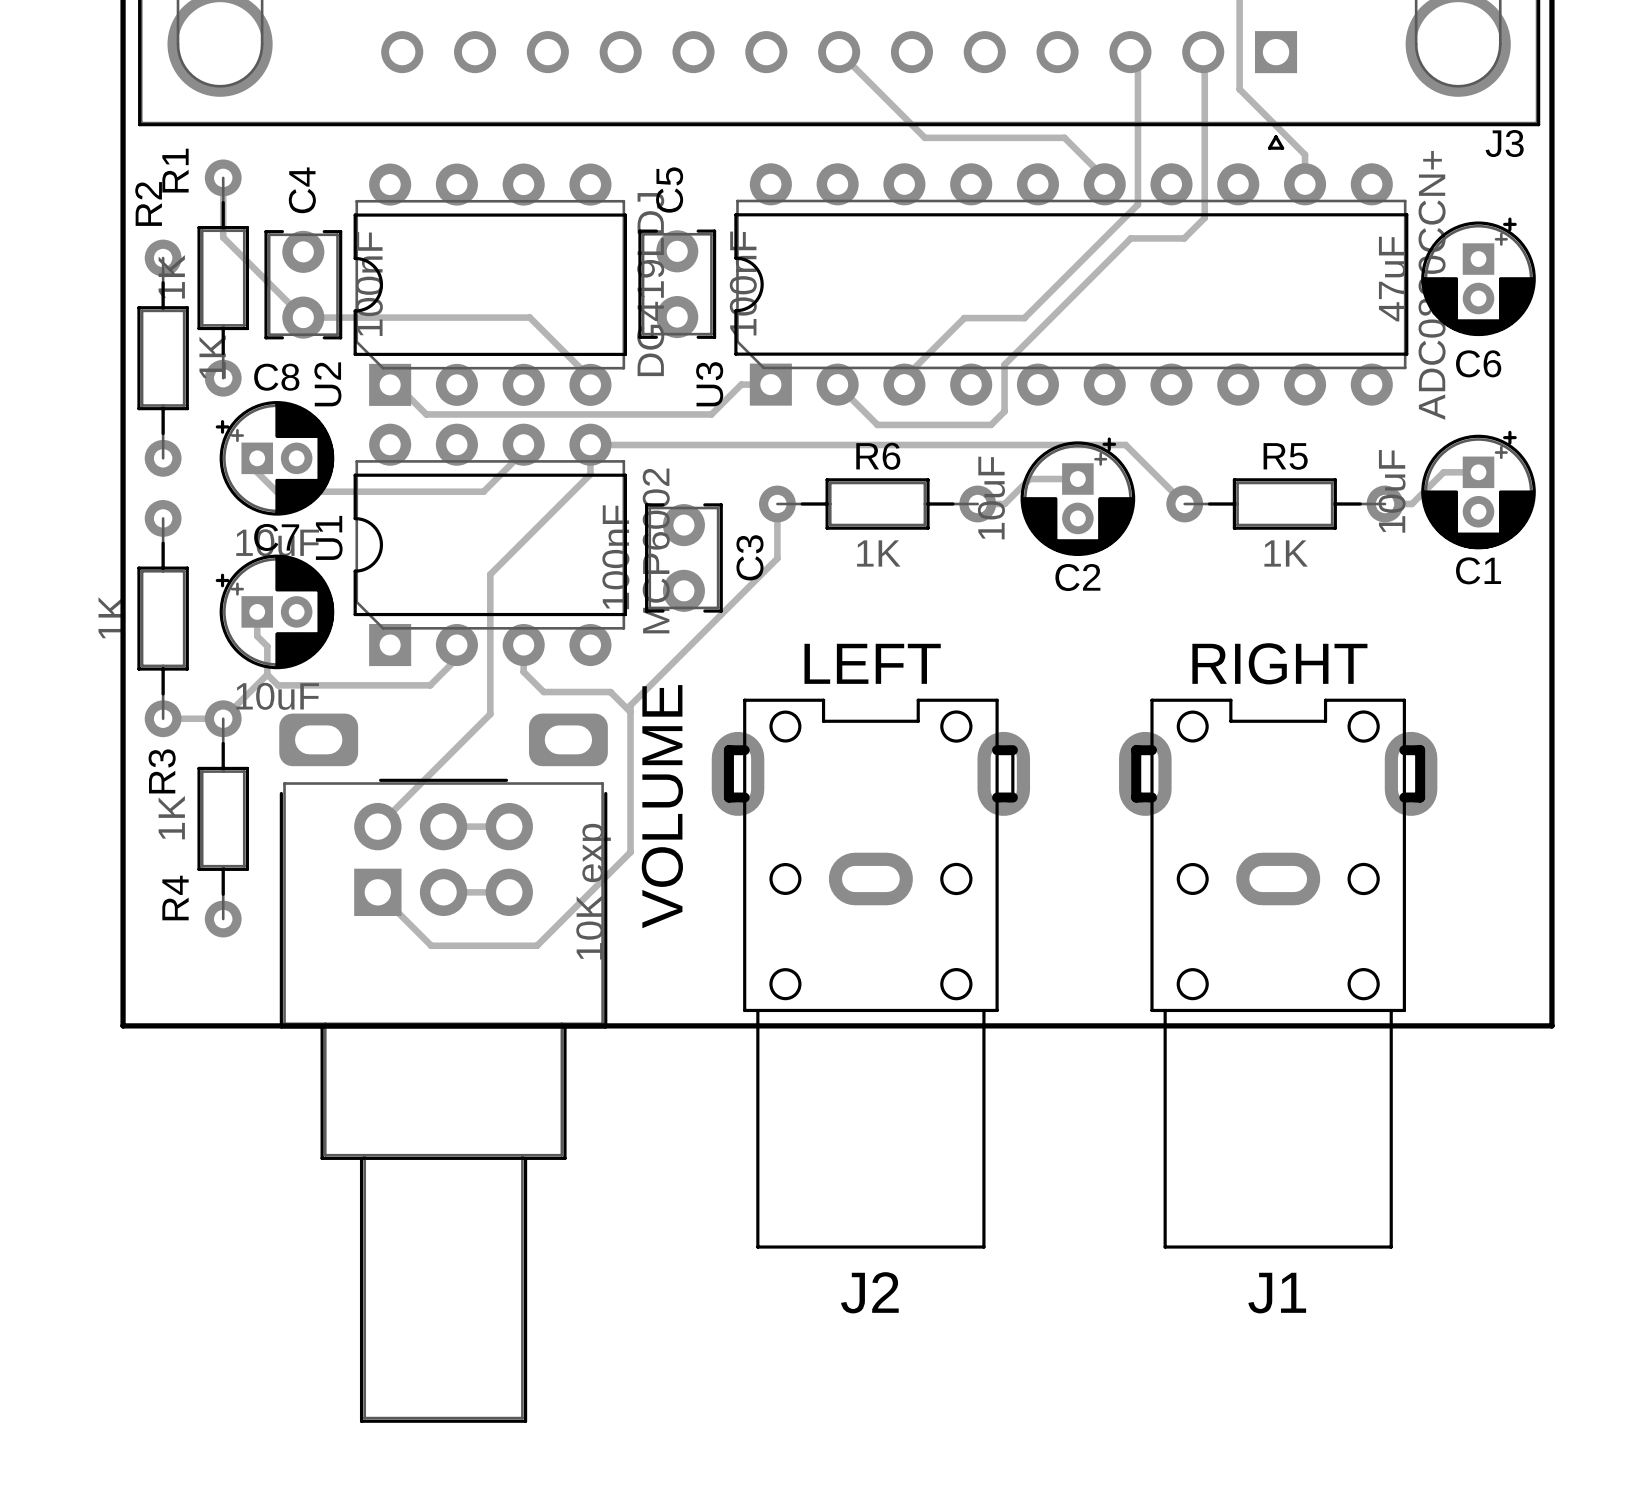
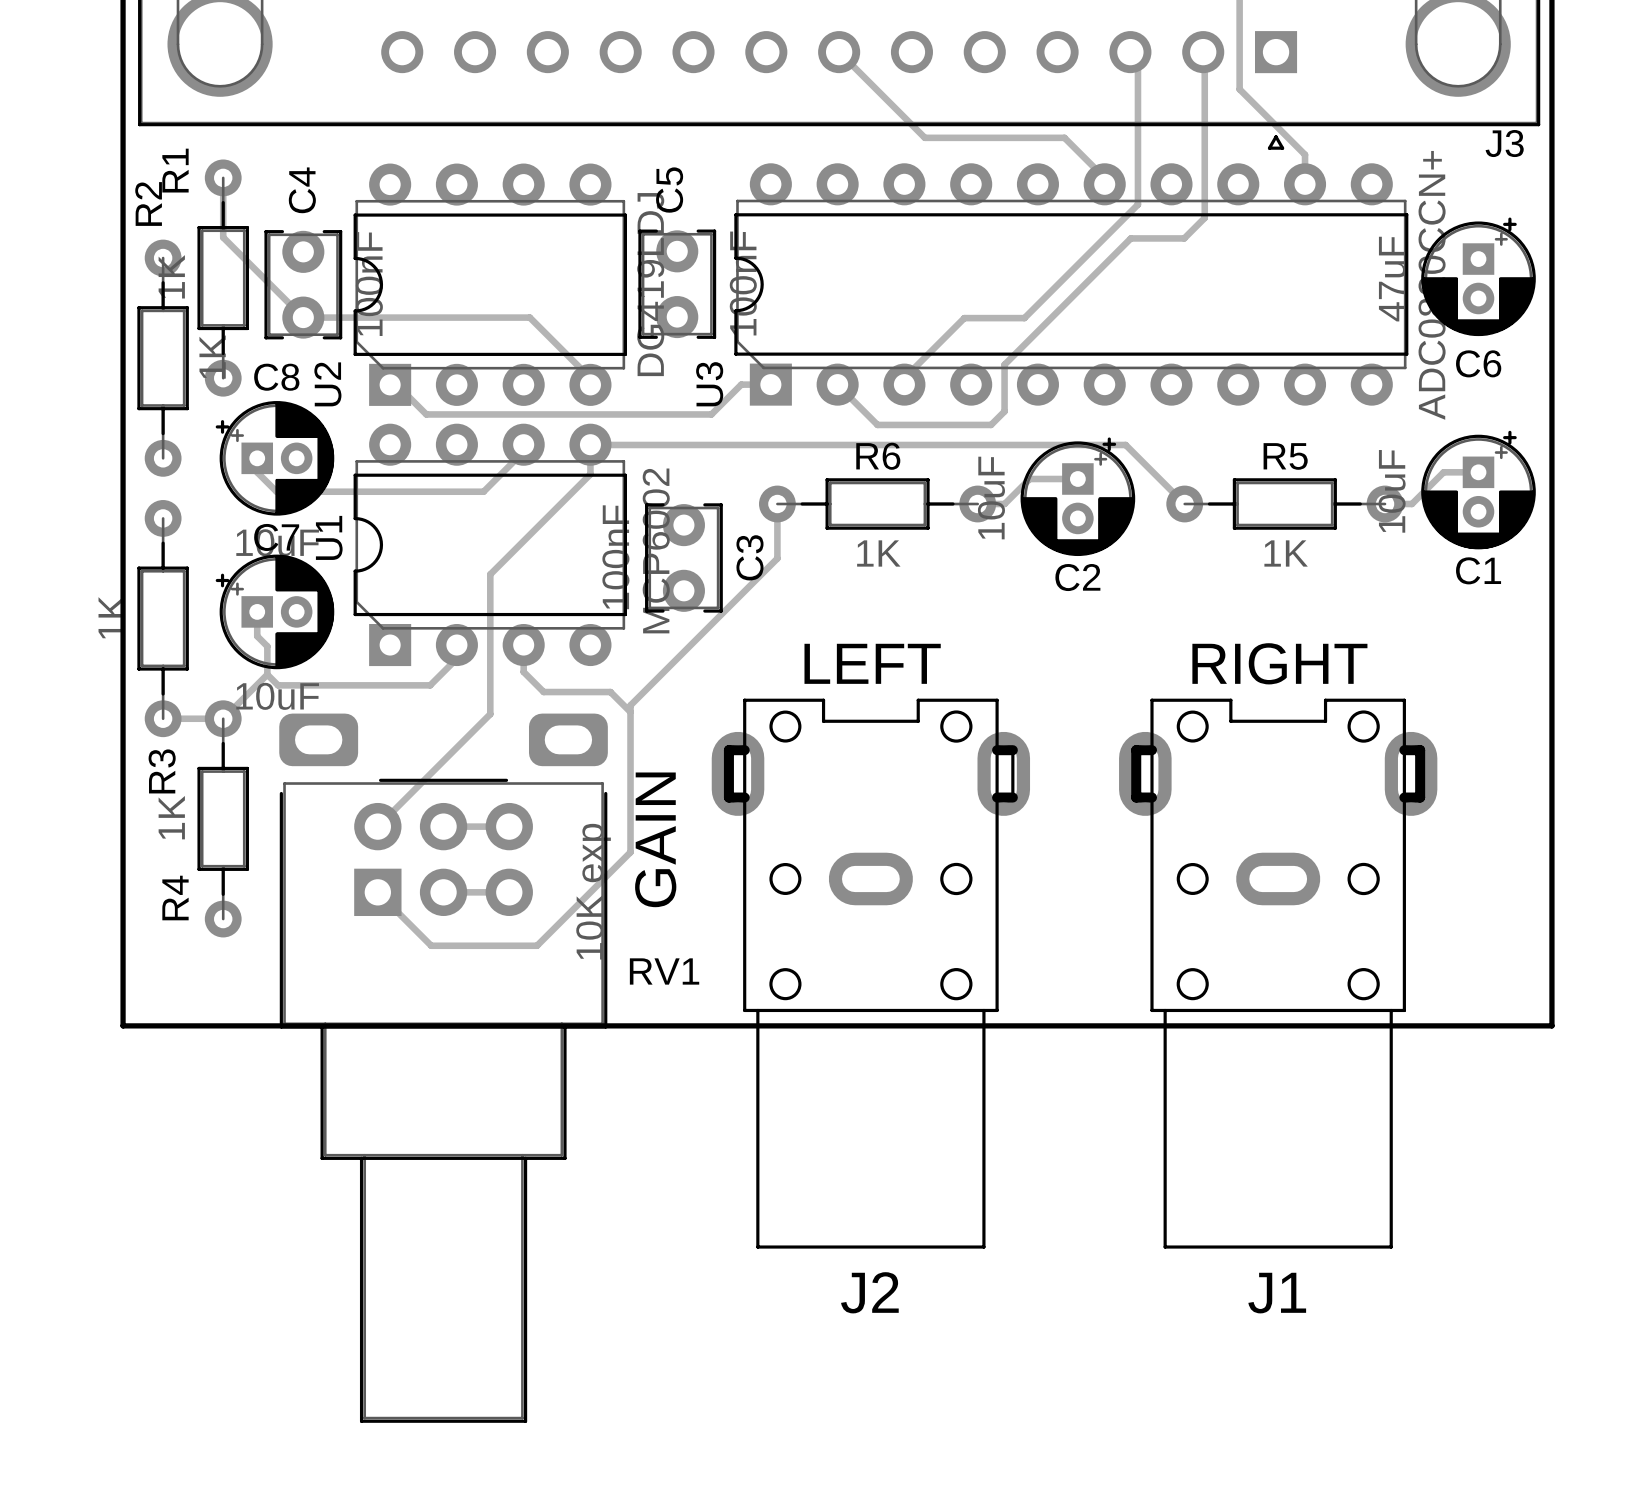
VOLUME name: VOLUME (662, 806) -> RV1 (664, 971)
text: none -> GAIN (655, 839)

